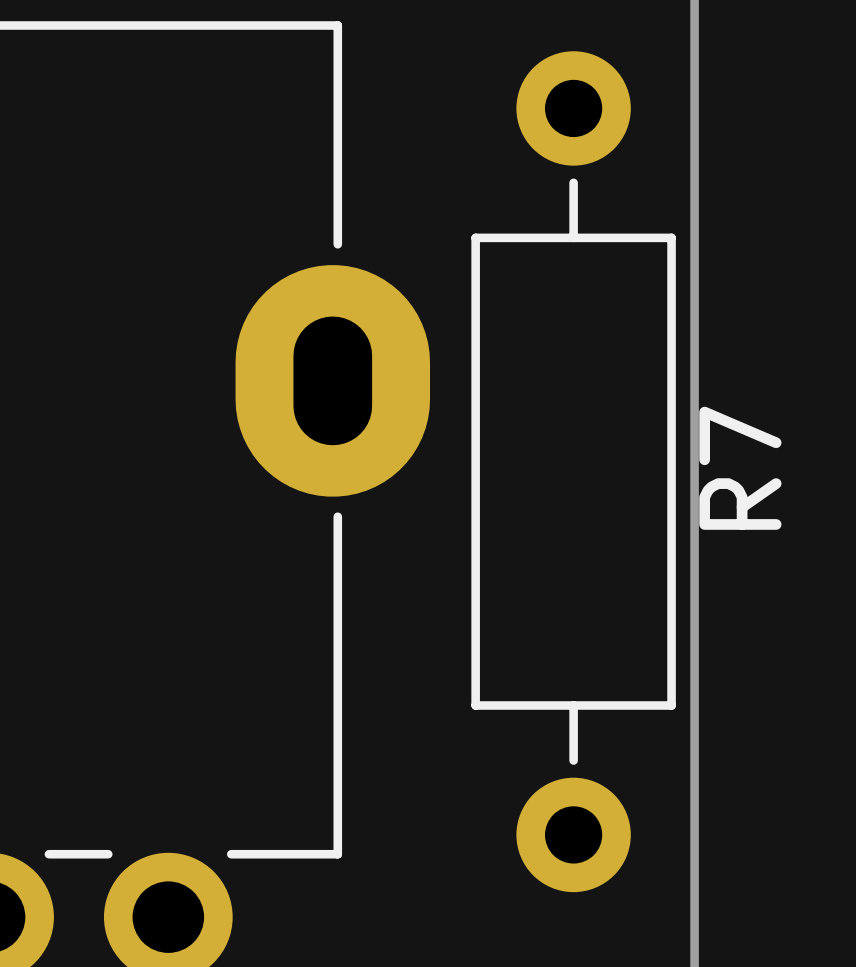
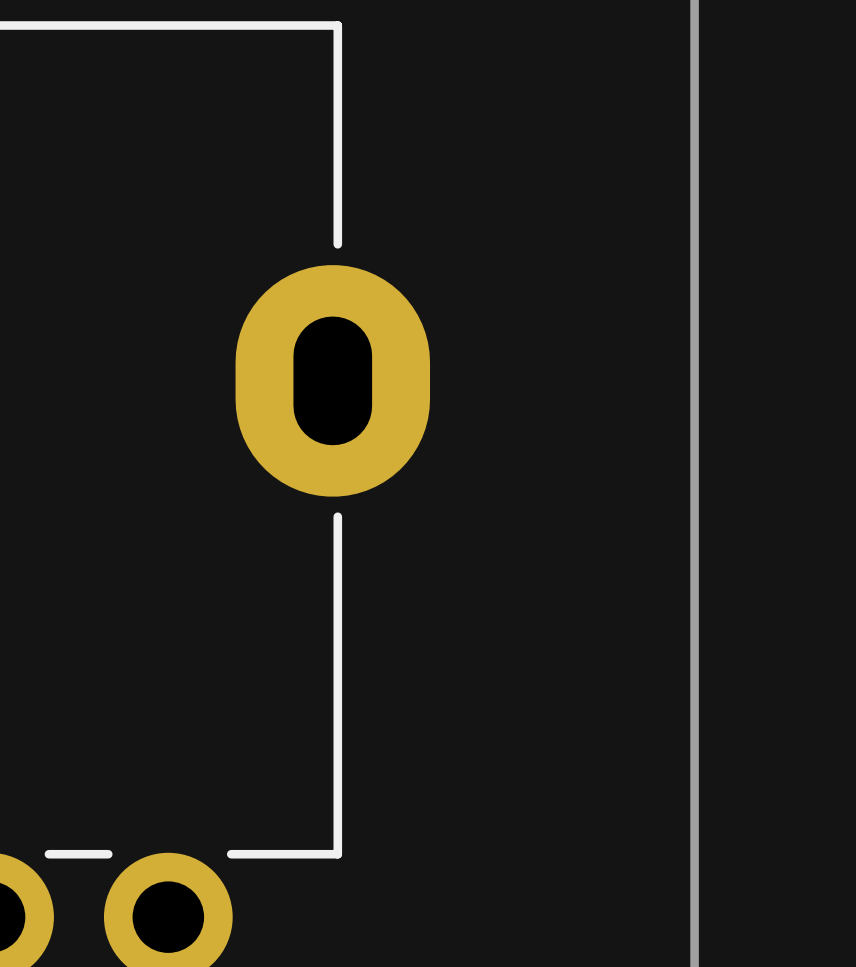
R7: (573, 471) -> none

